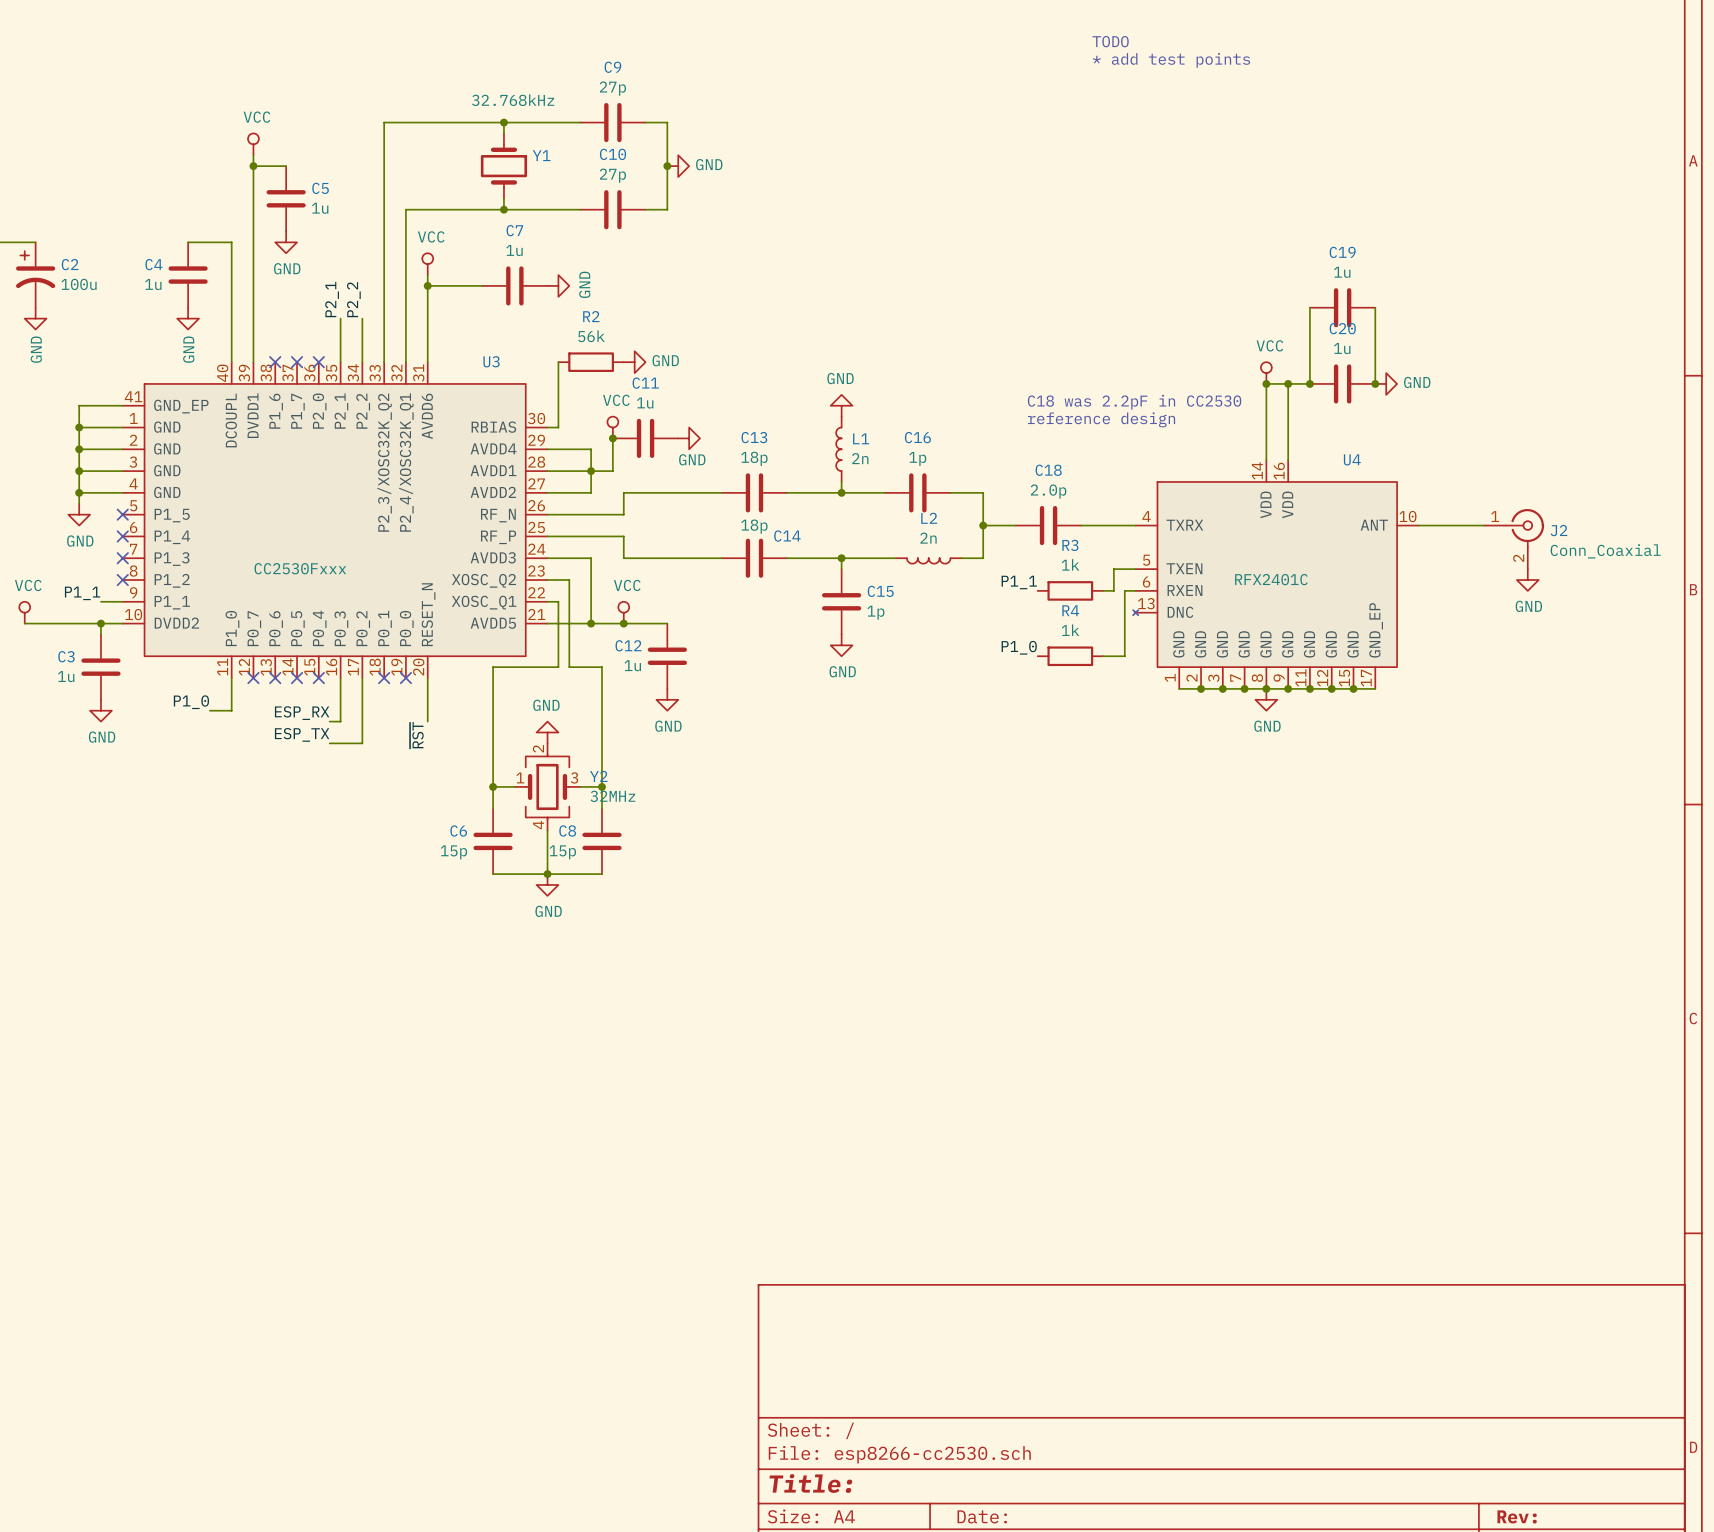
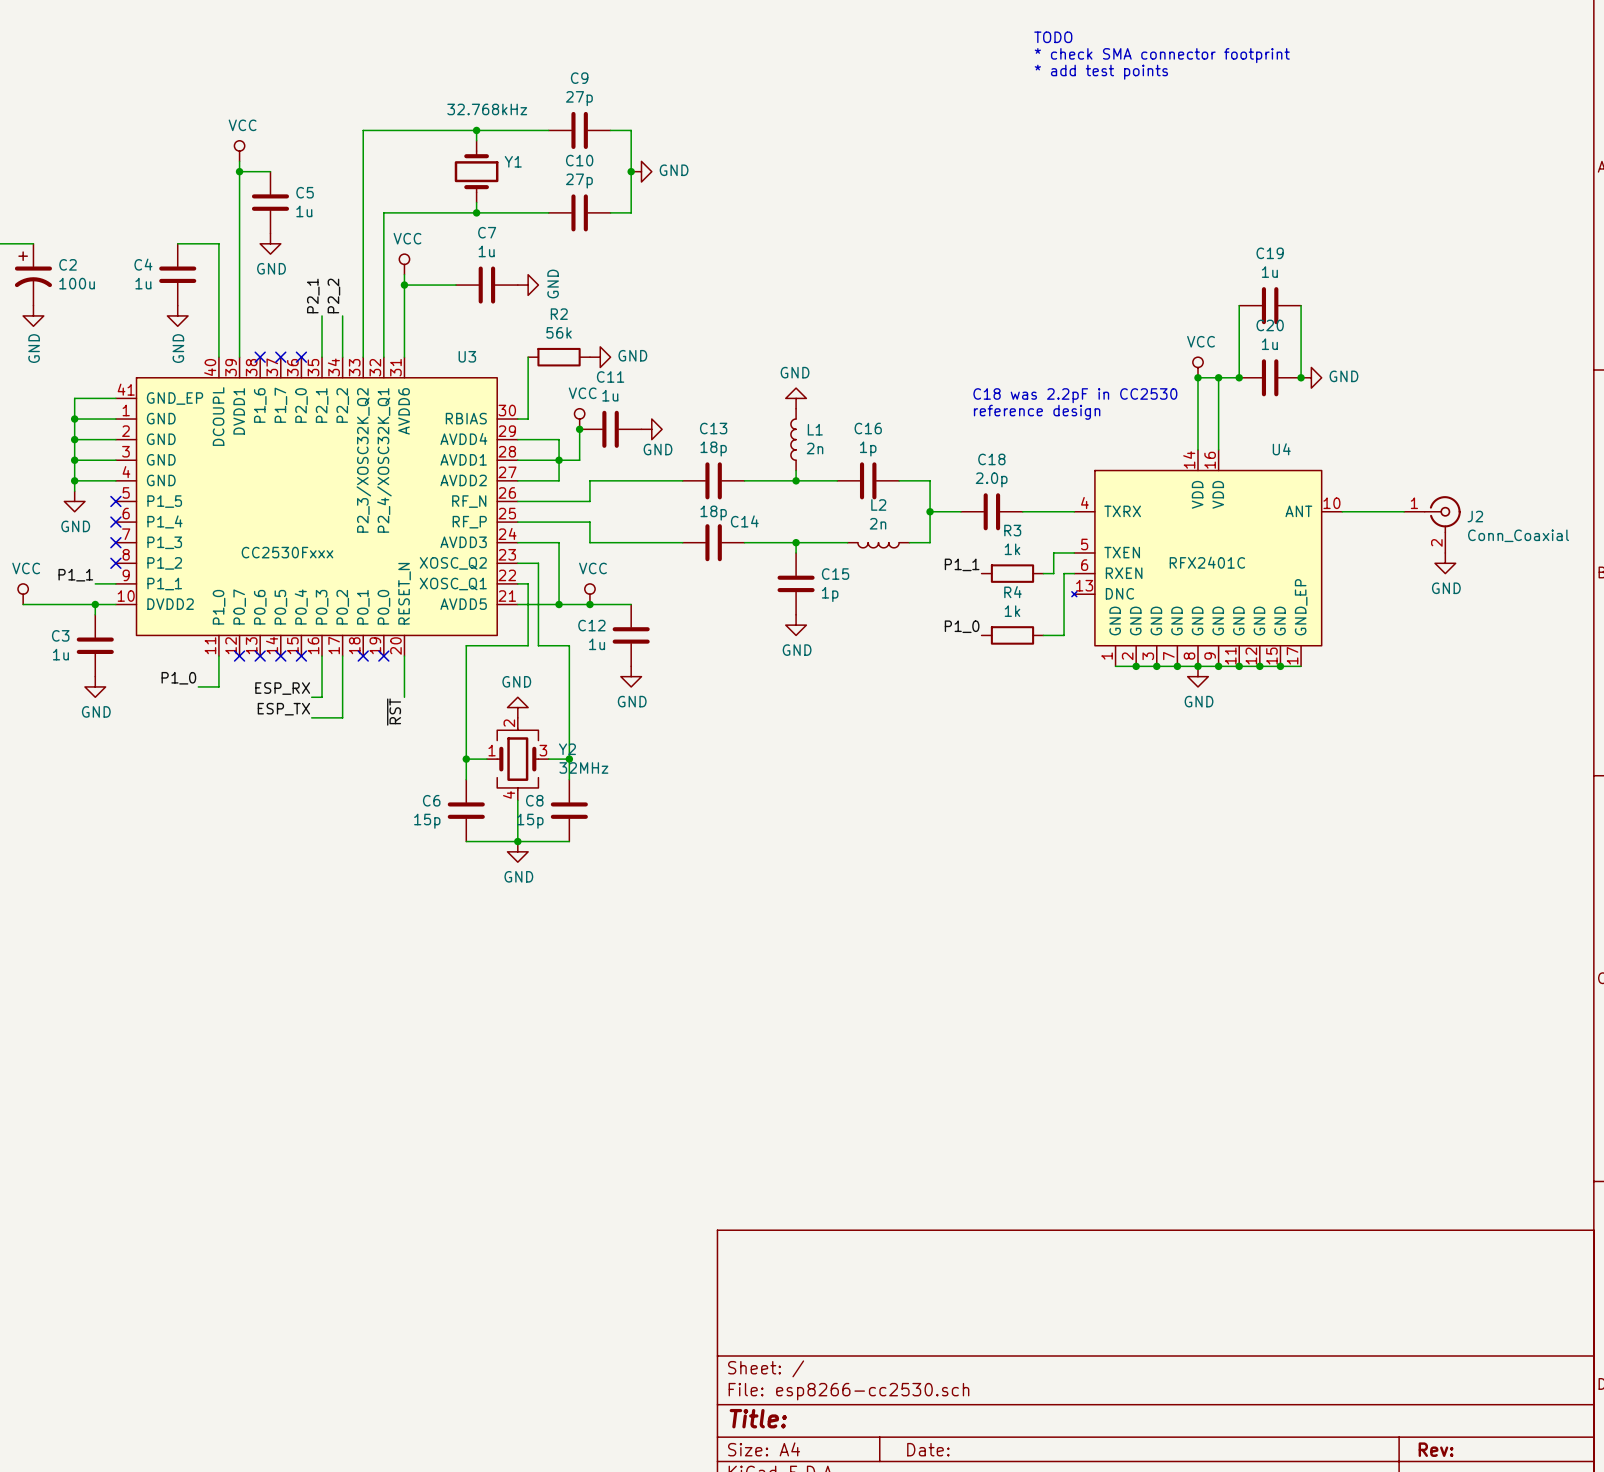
text: none -> TODO (1053, 37)
text: TODO (1110, 41) -> * check SMA connector footprint (1162, 55)

